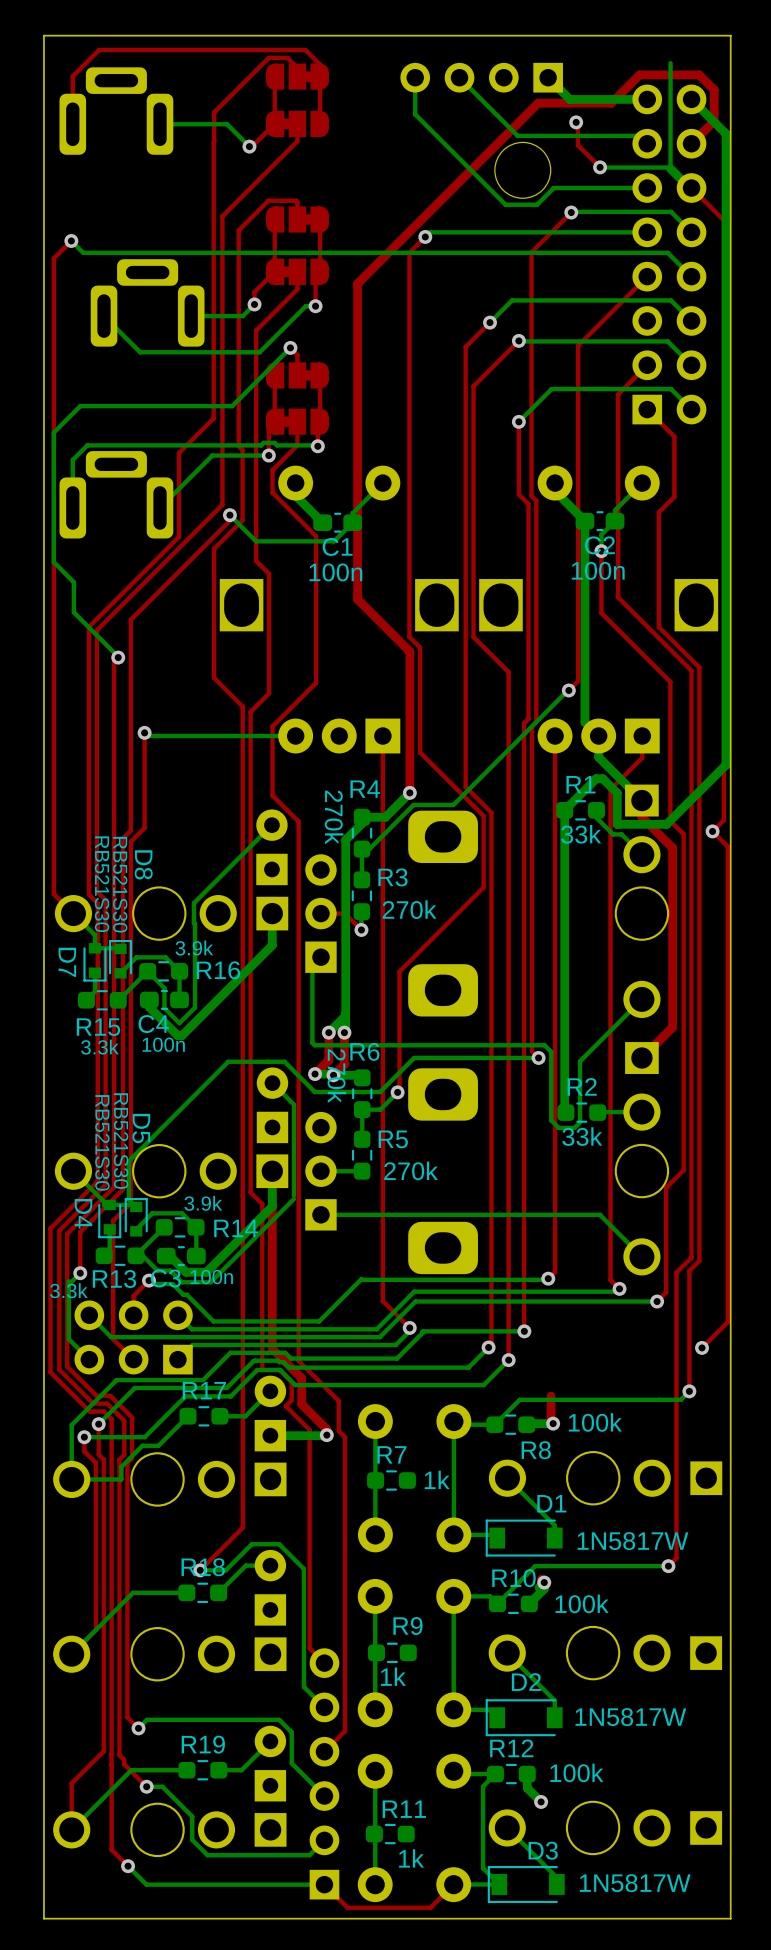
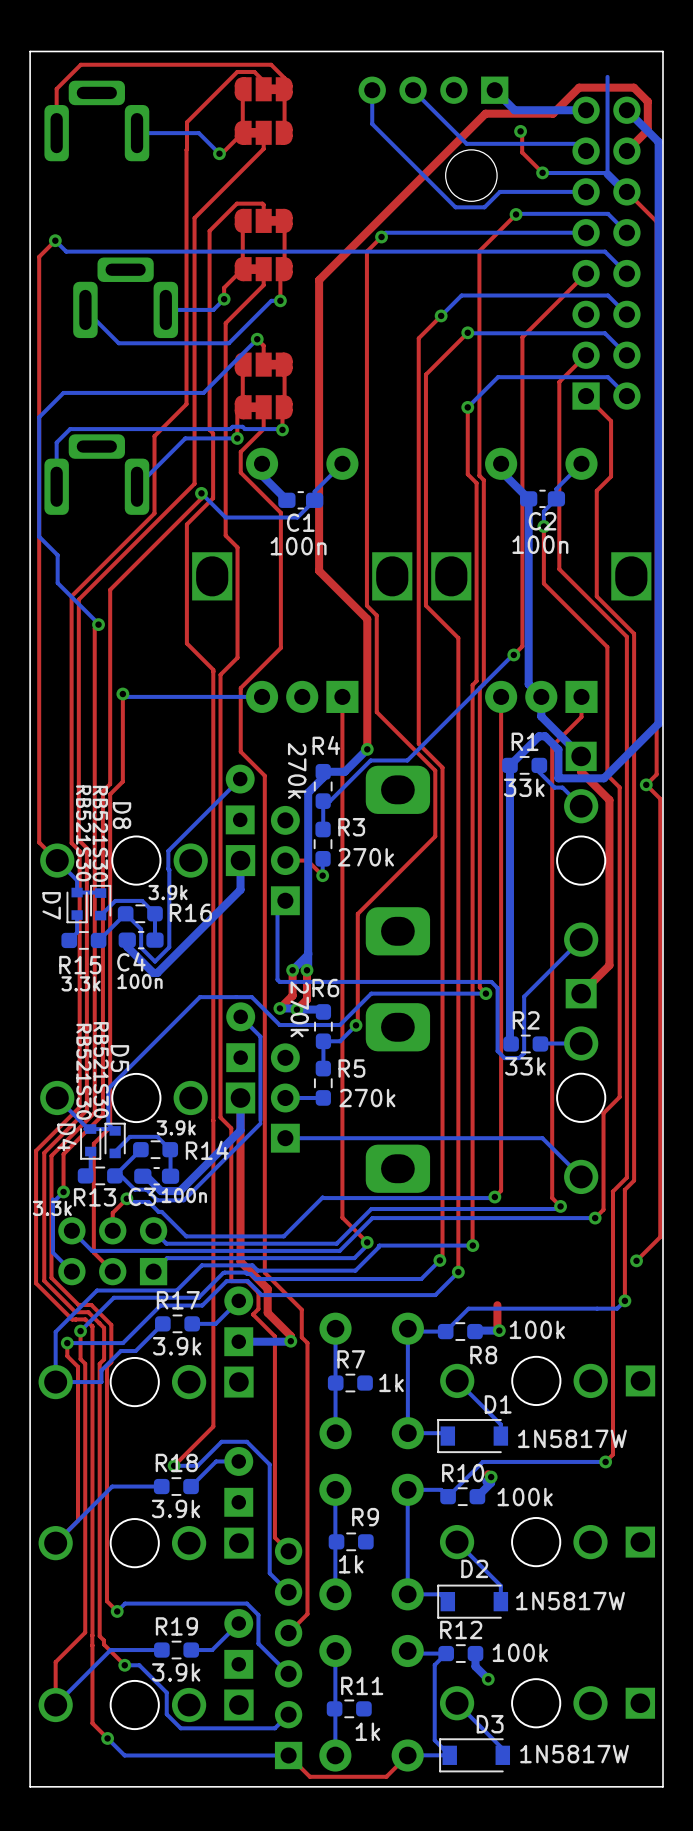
R17 value: none -> 3.9k (177, 1346)
R18 value: none -> 3.9k (176, 1508)
R19 value: none -> 3.9k (176, 1672)

